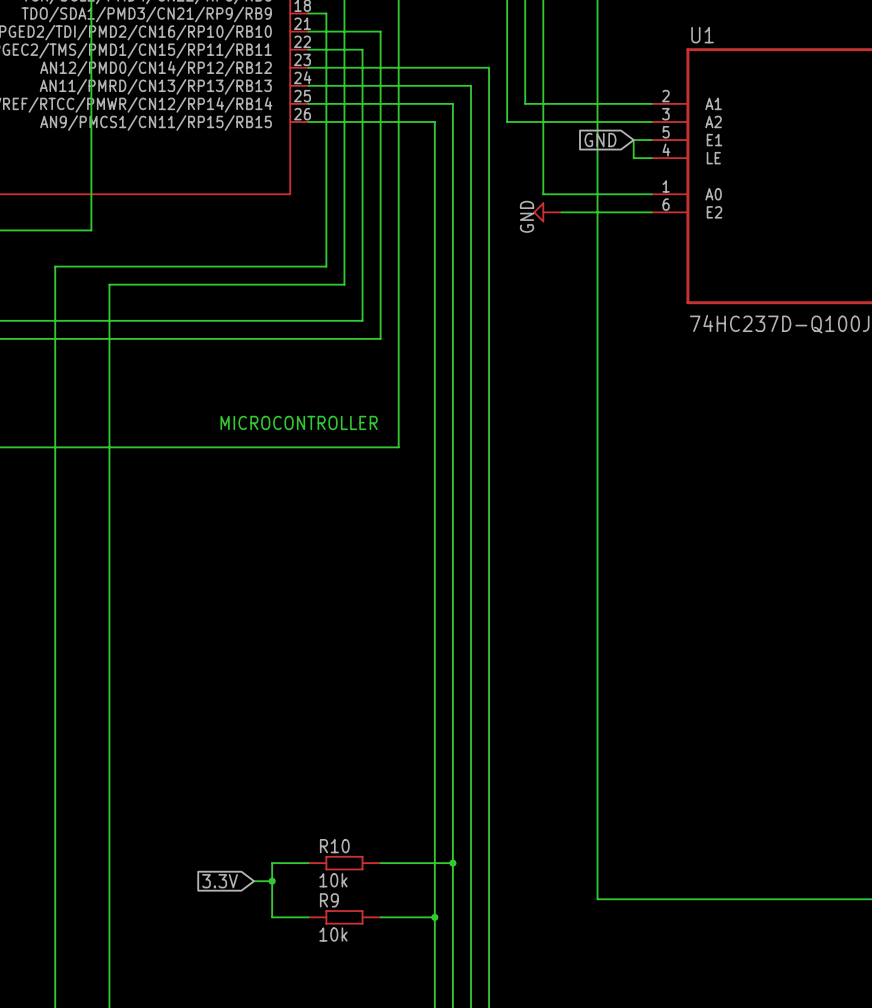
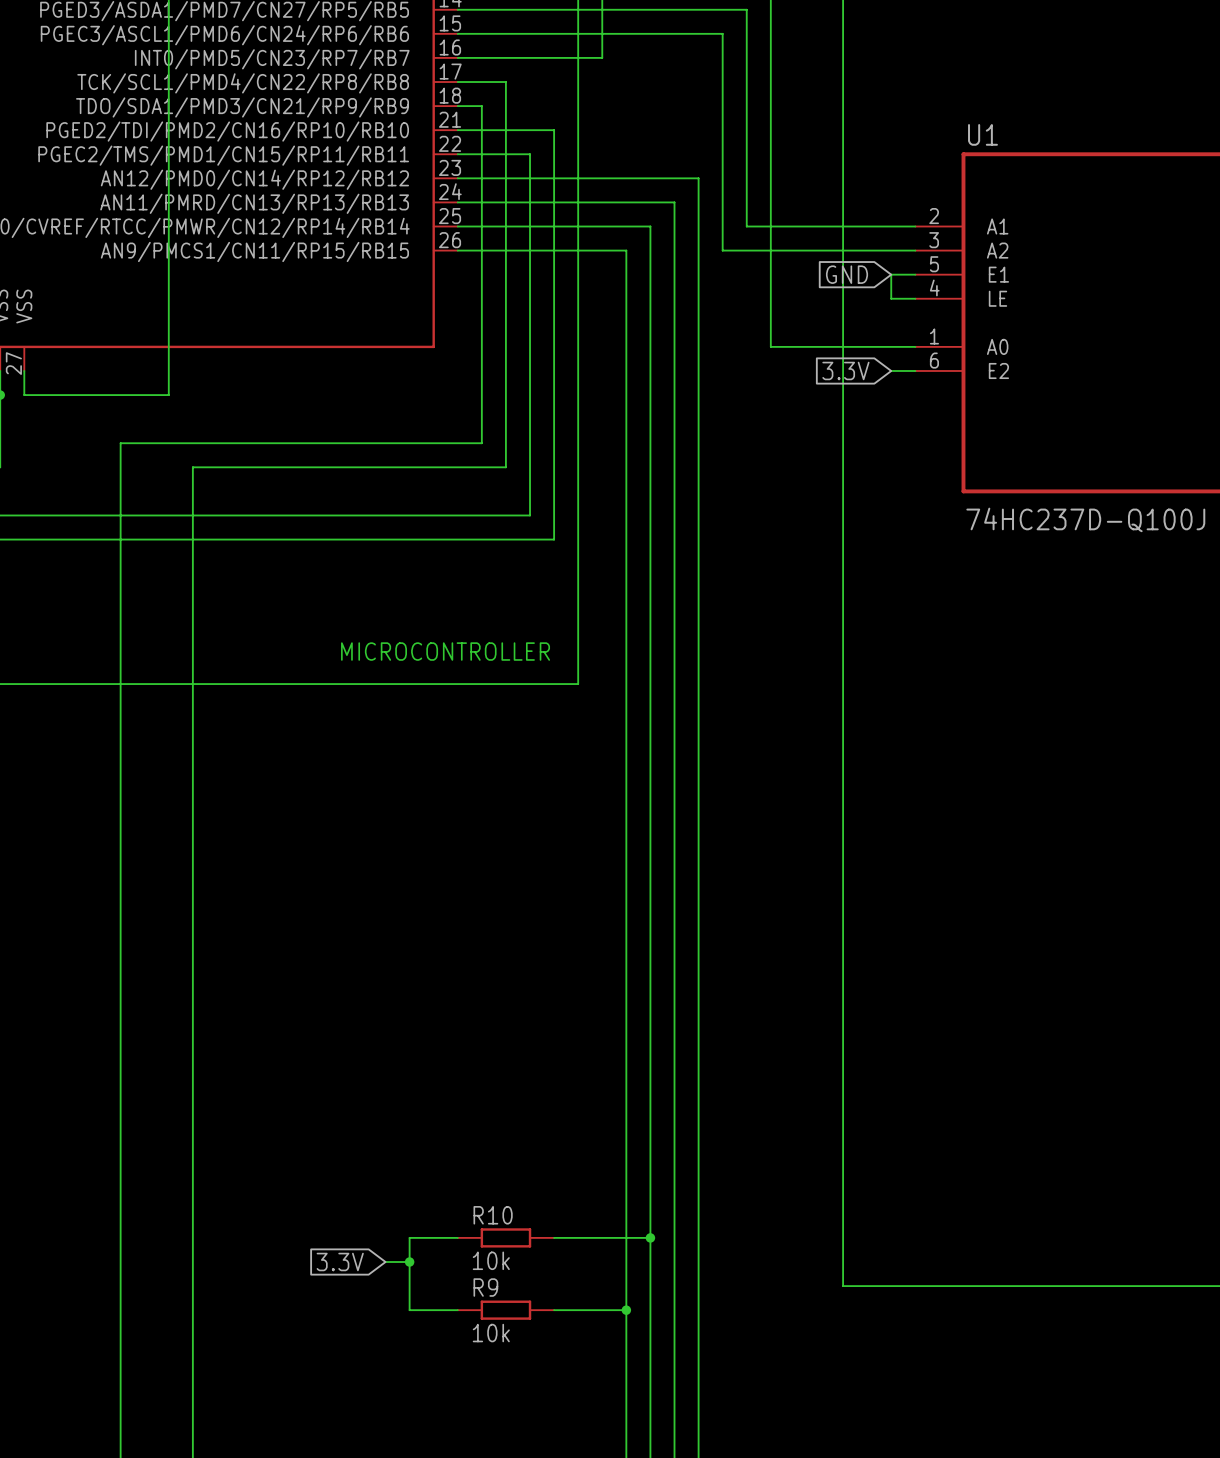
power symbol: GND (547, 212) -> none
wire: (561, 212) (633, 212) -> none
global label: none -> 3.3V (845, 370)

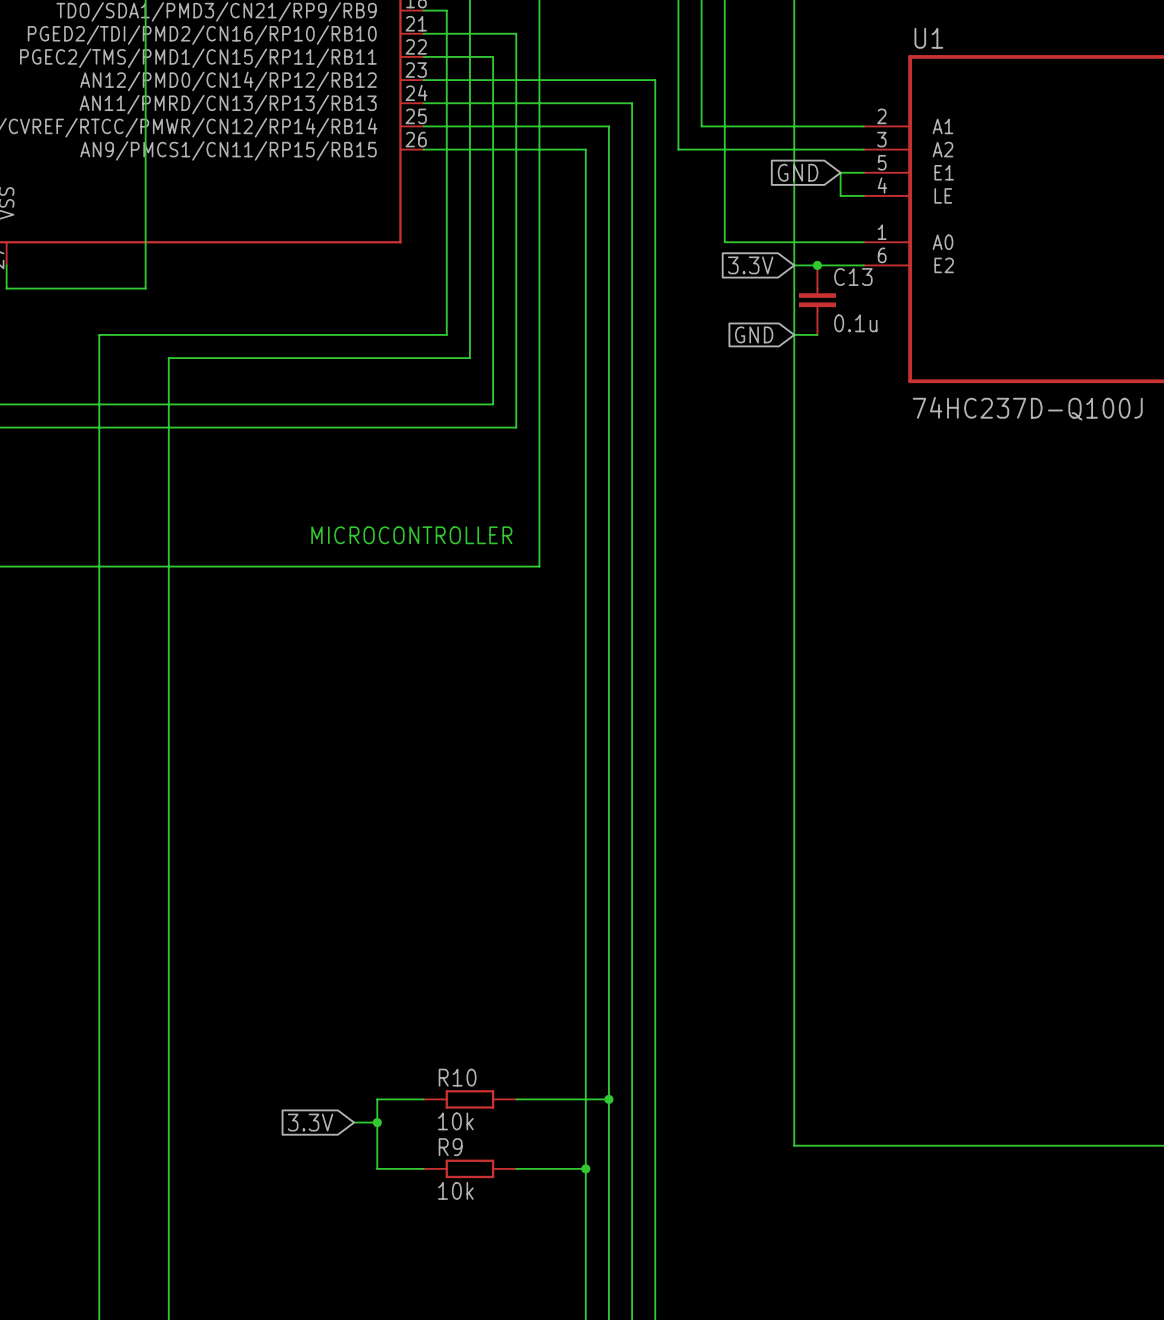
wire: none -> (794, 265) (840, 265)
global label position: 3.3V (845, 370) -> 3.3V (750, 265)
junction: none -> (817, 265)
C13: none -> 0.1u (817, 300)
global label: none -> GND (754, 334)
wire: none -> (794, 334) (817, 334)

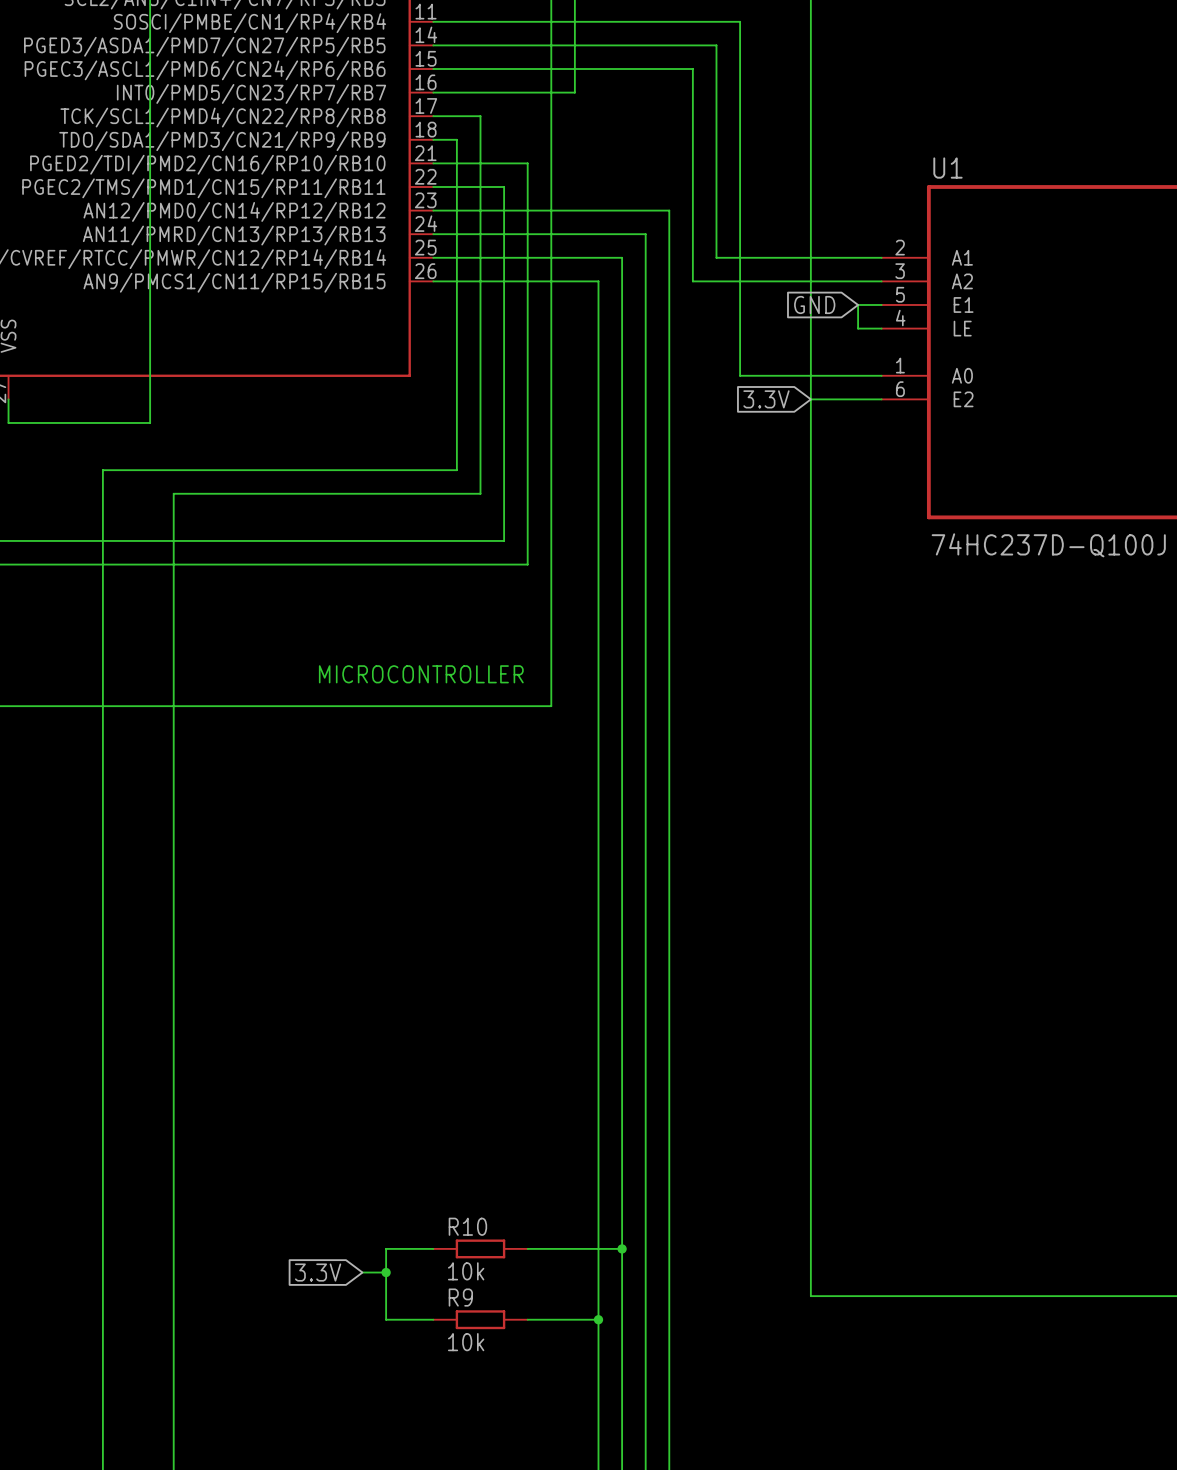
junction: (817, 265) -> none
C13: 0.1u (817, 300) -> none
global label: GND (754, 334) -> none
wire: (794, 334) (817, 334) -> none

